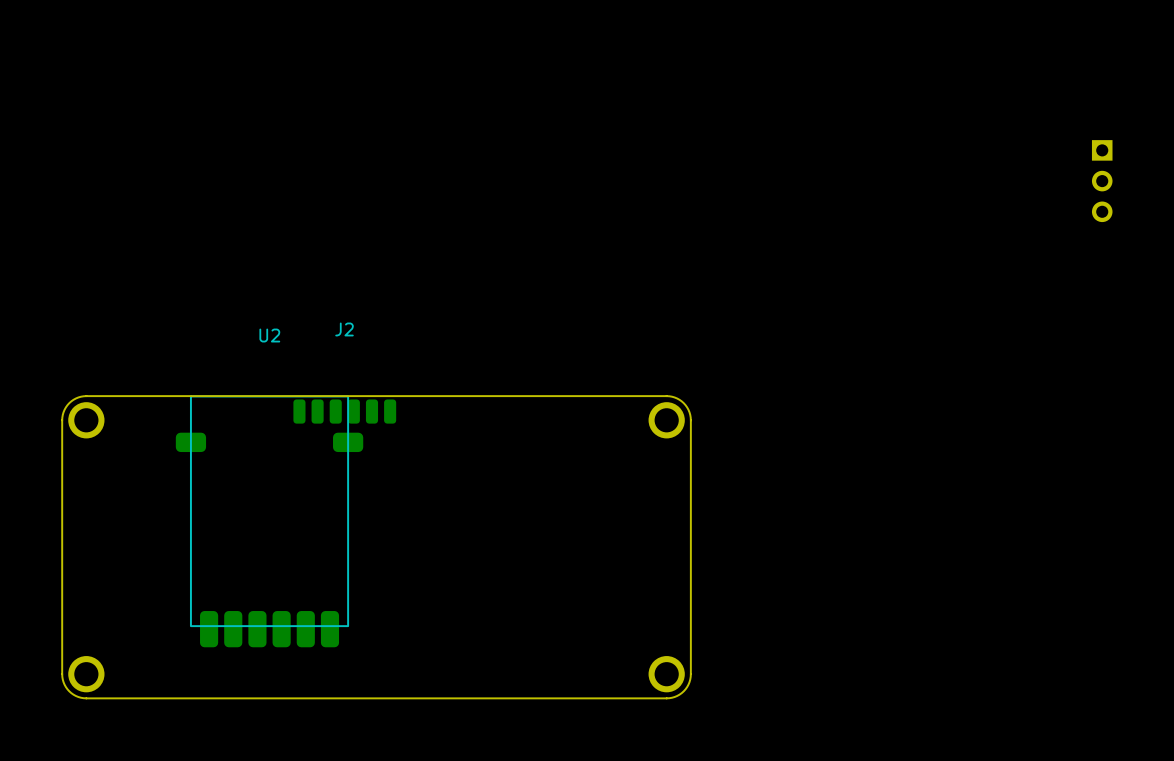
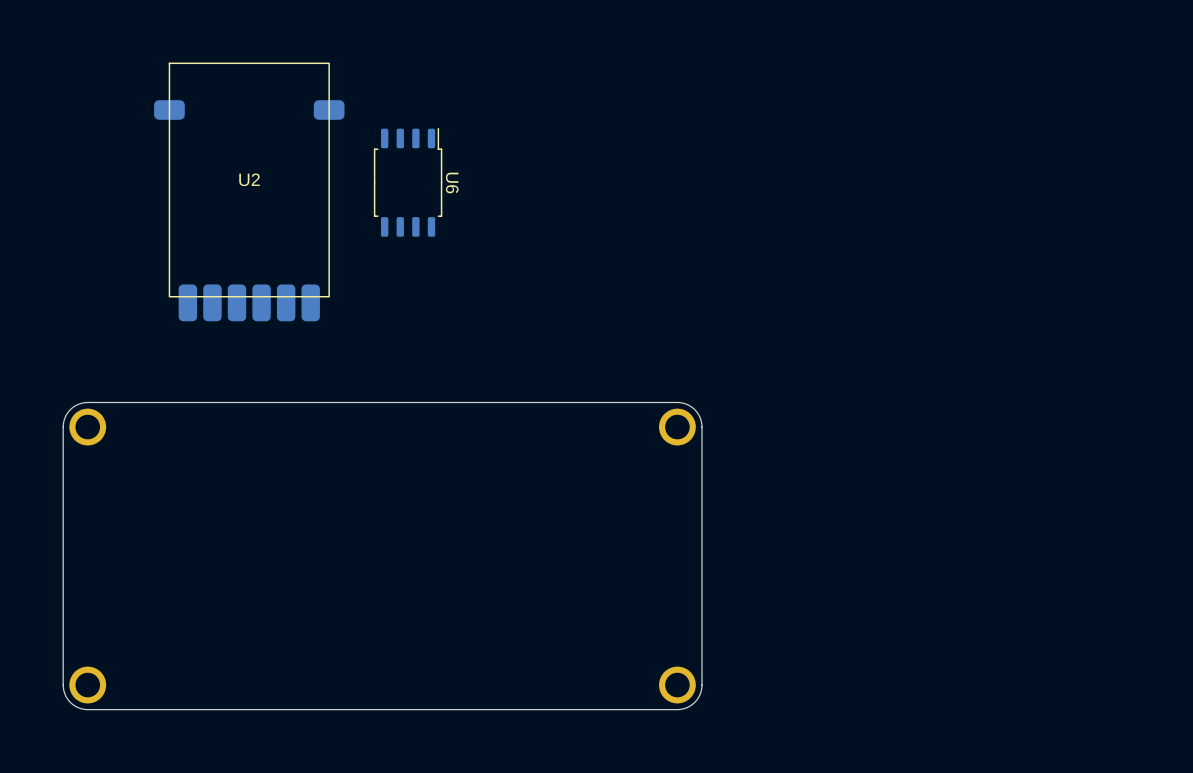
U6: none -> (408, 182)
part: (1102, 181) -> none
U2 name position: U2 (269, 335) -> U2 (249, 179)
U2 footprint: [175, 395, 364, 648] -> [154, 62, 345, 322]
J2: (344, 411) -> none

